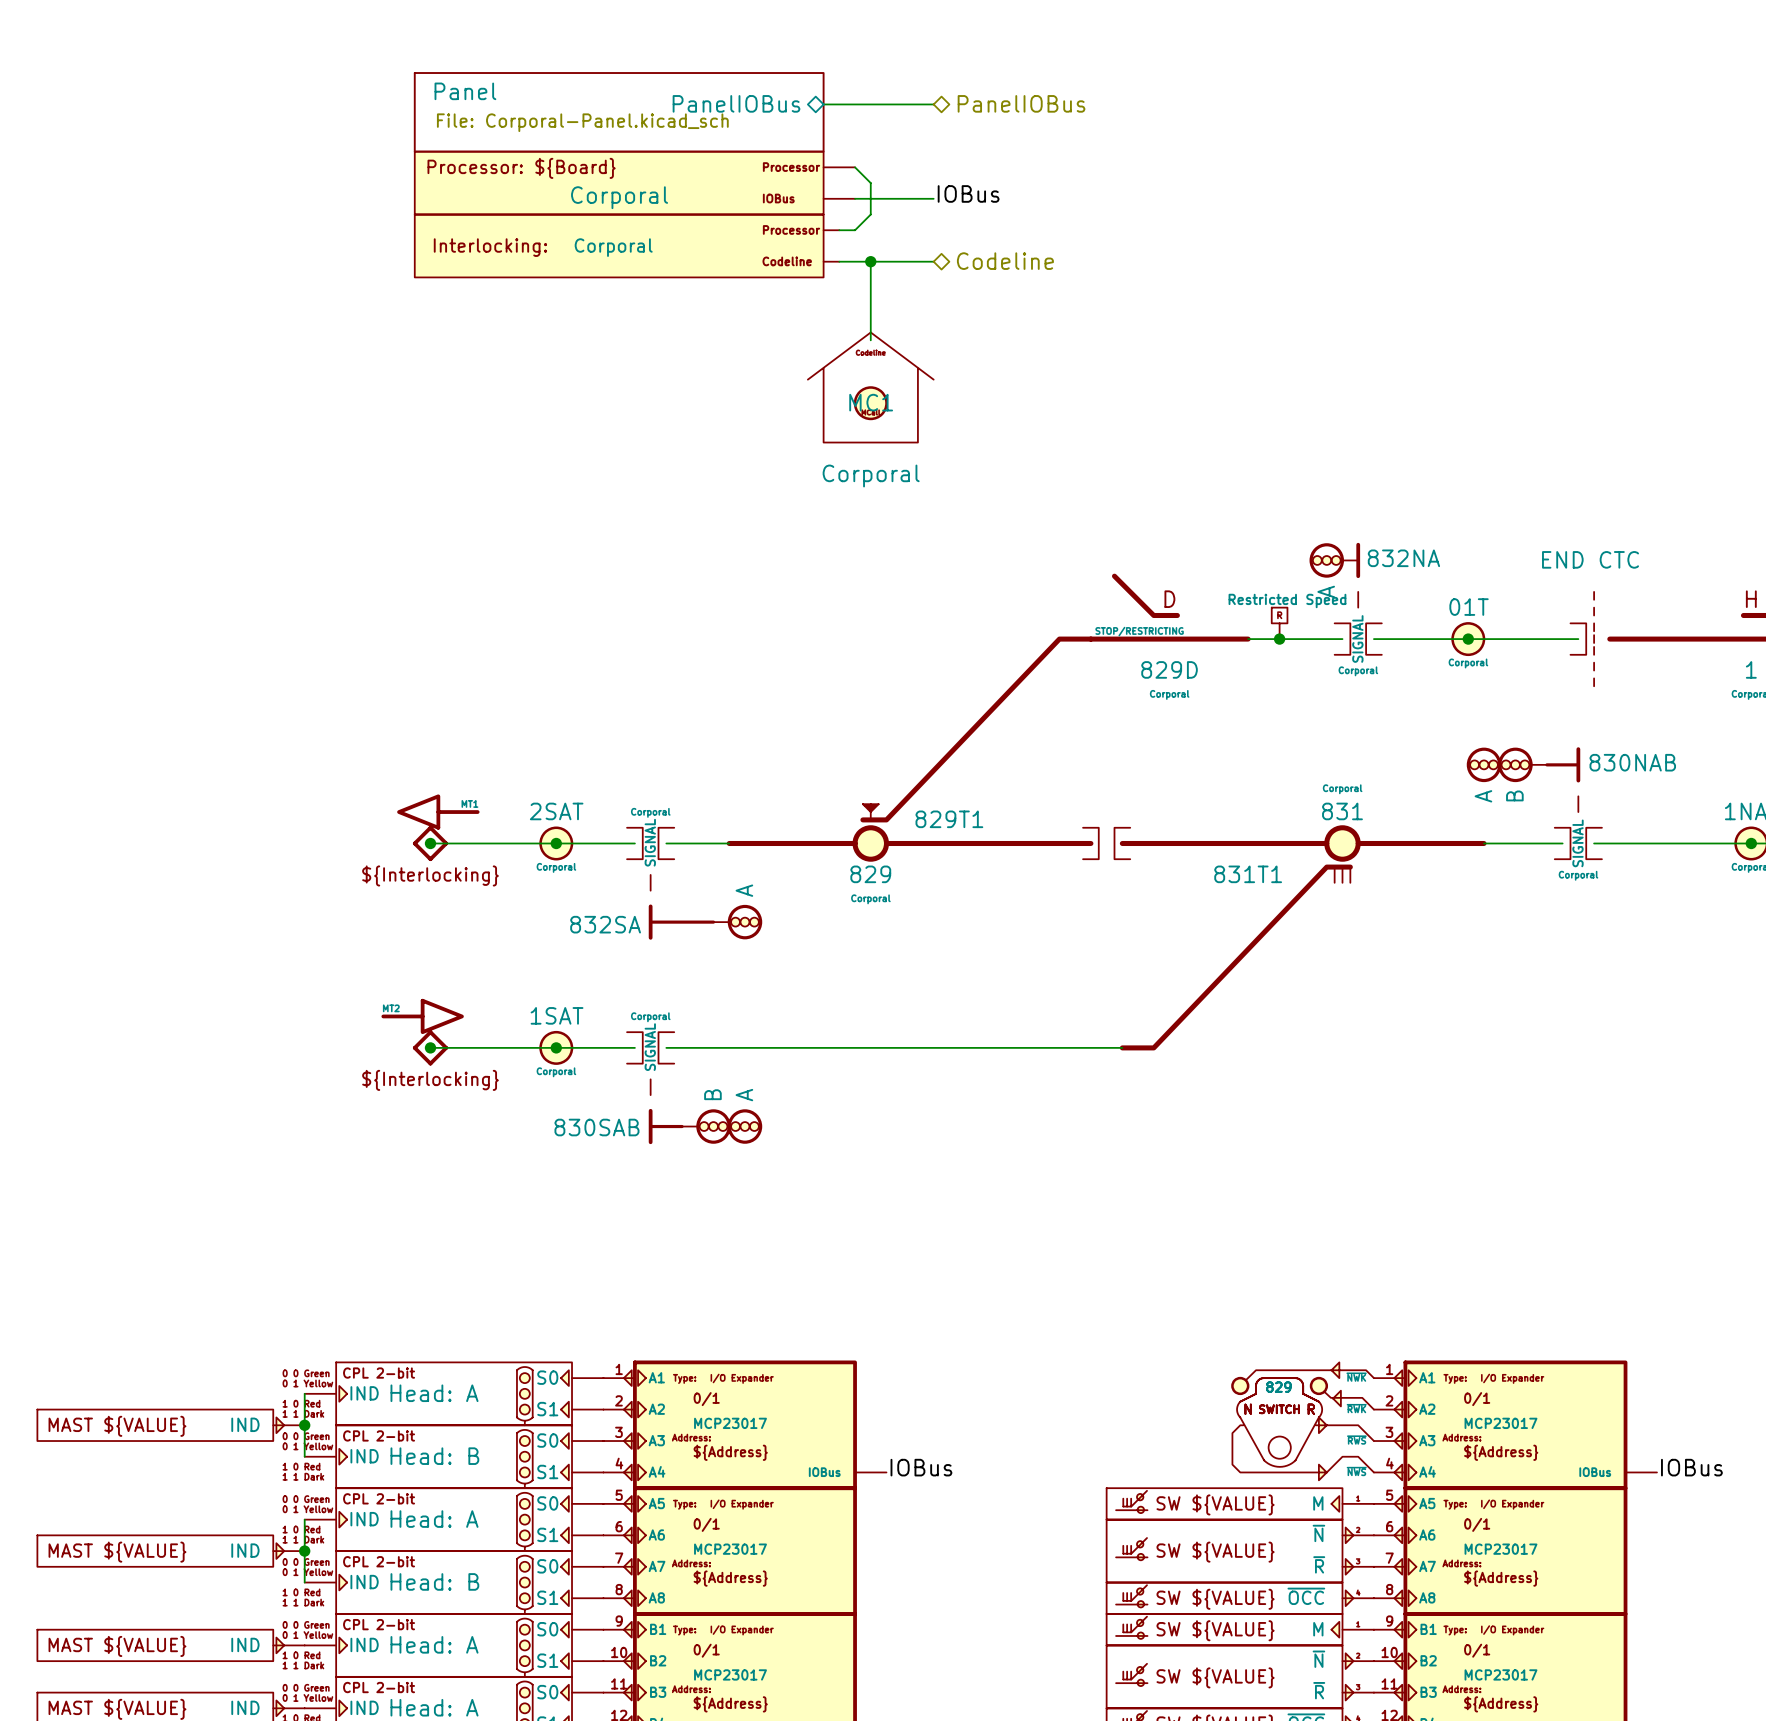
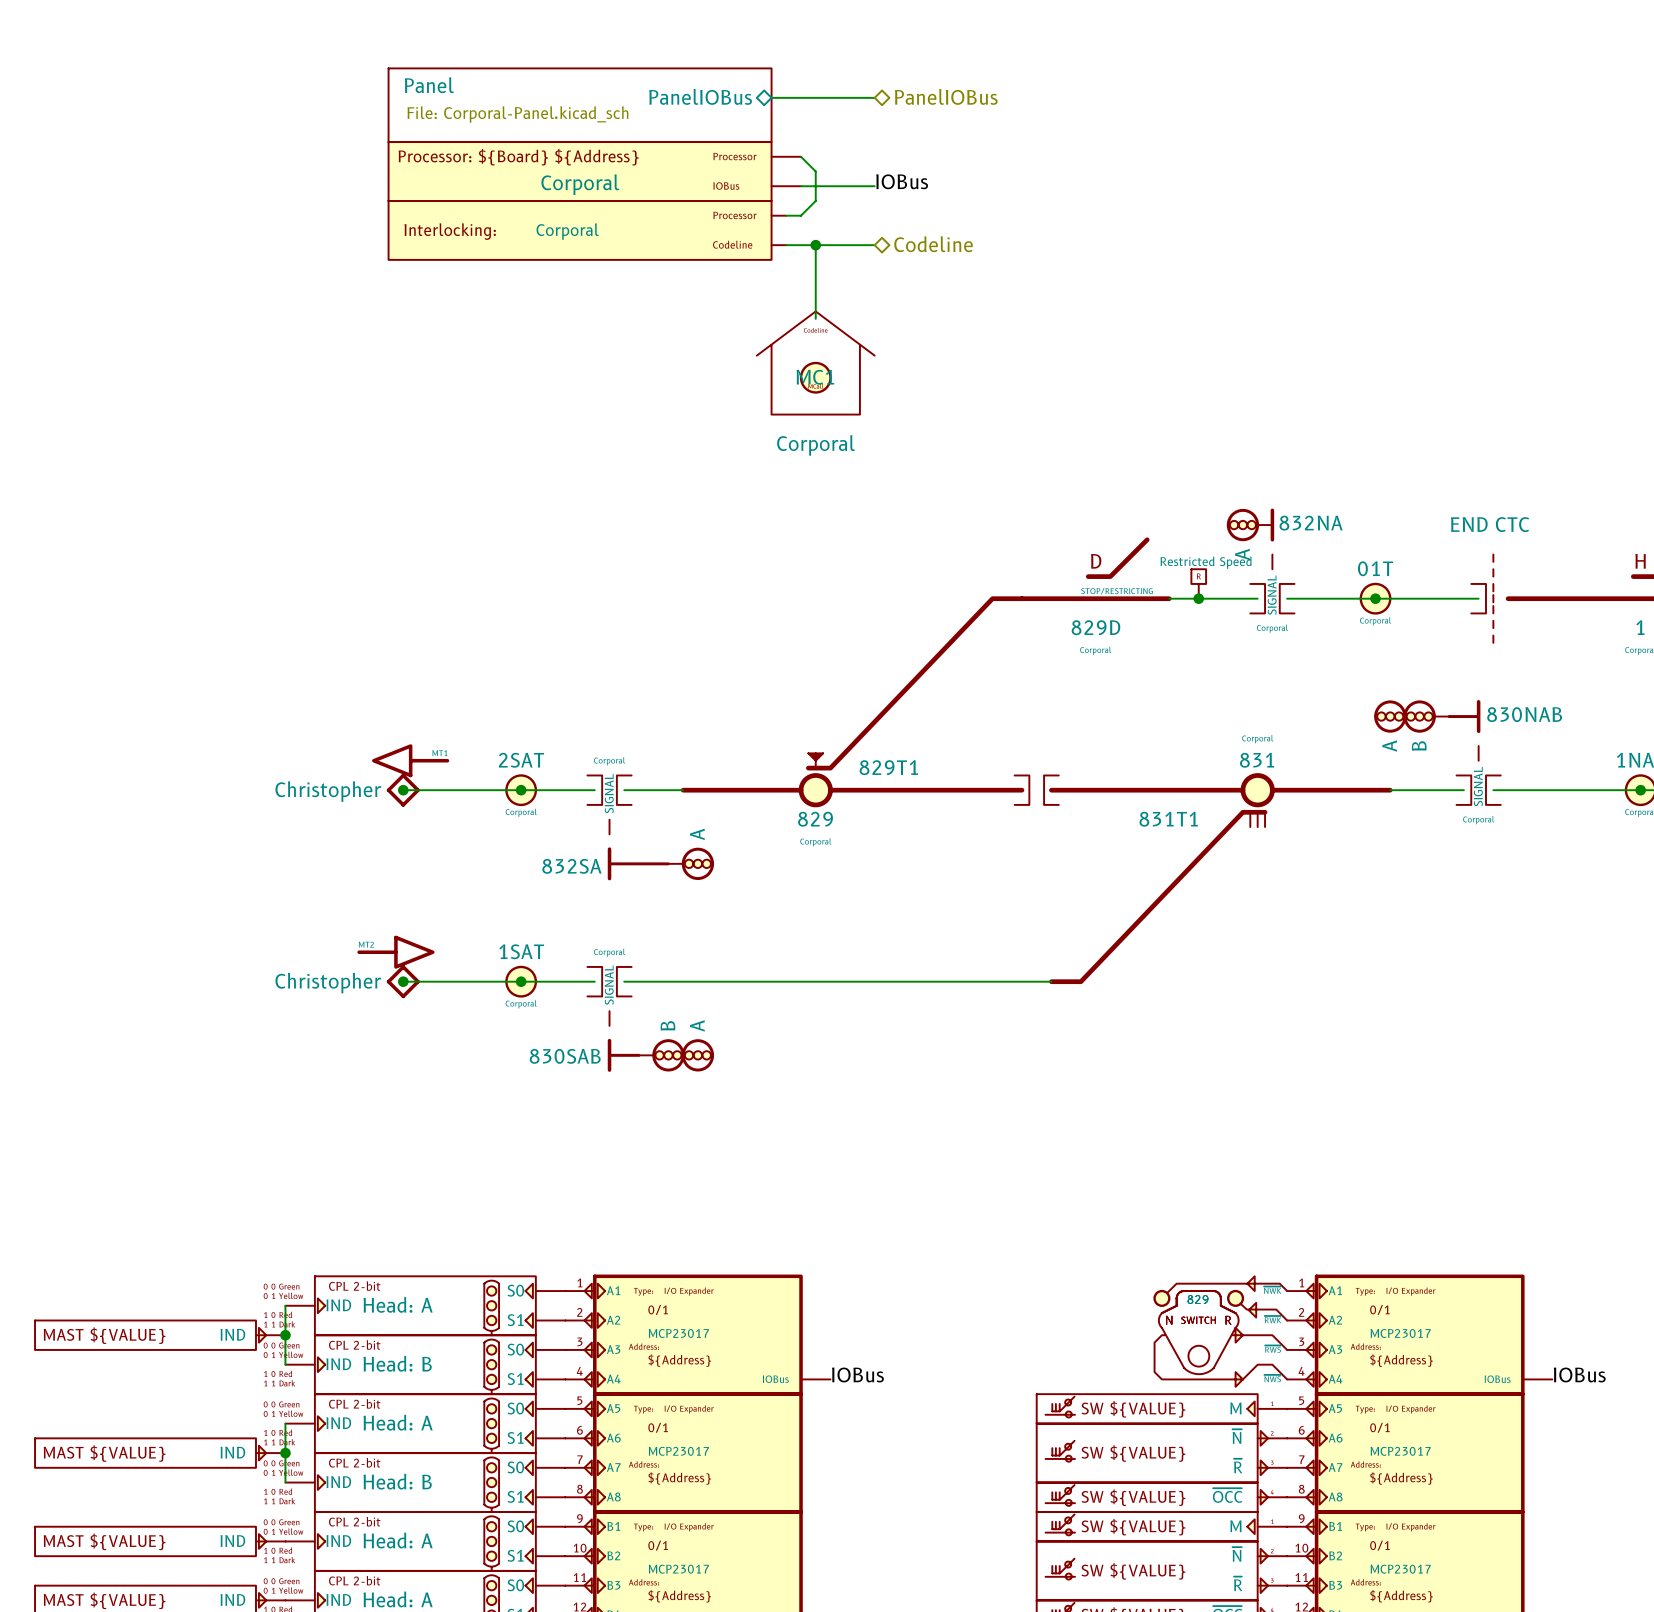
part text: Processor: ${Board} (521, 168) -> Processor: ${Board} ${Address} (518, 157)
part flip: as is (1169, 607) -> left-right (1095, 569)
part value: none -> Christopher (328, 791)
part text: ${Interlocking} (430, 875) -> none
part value: none -> Christopher (328, 983)
part text: ${Interlocking} (430, 1080) -> none

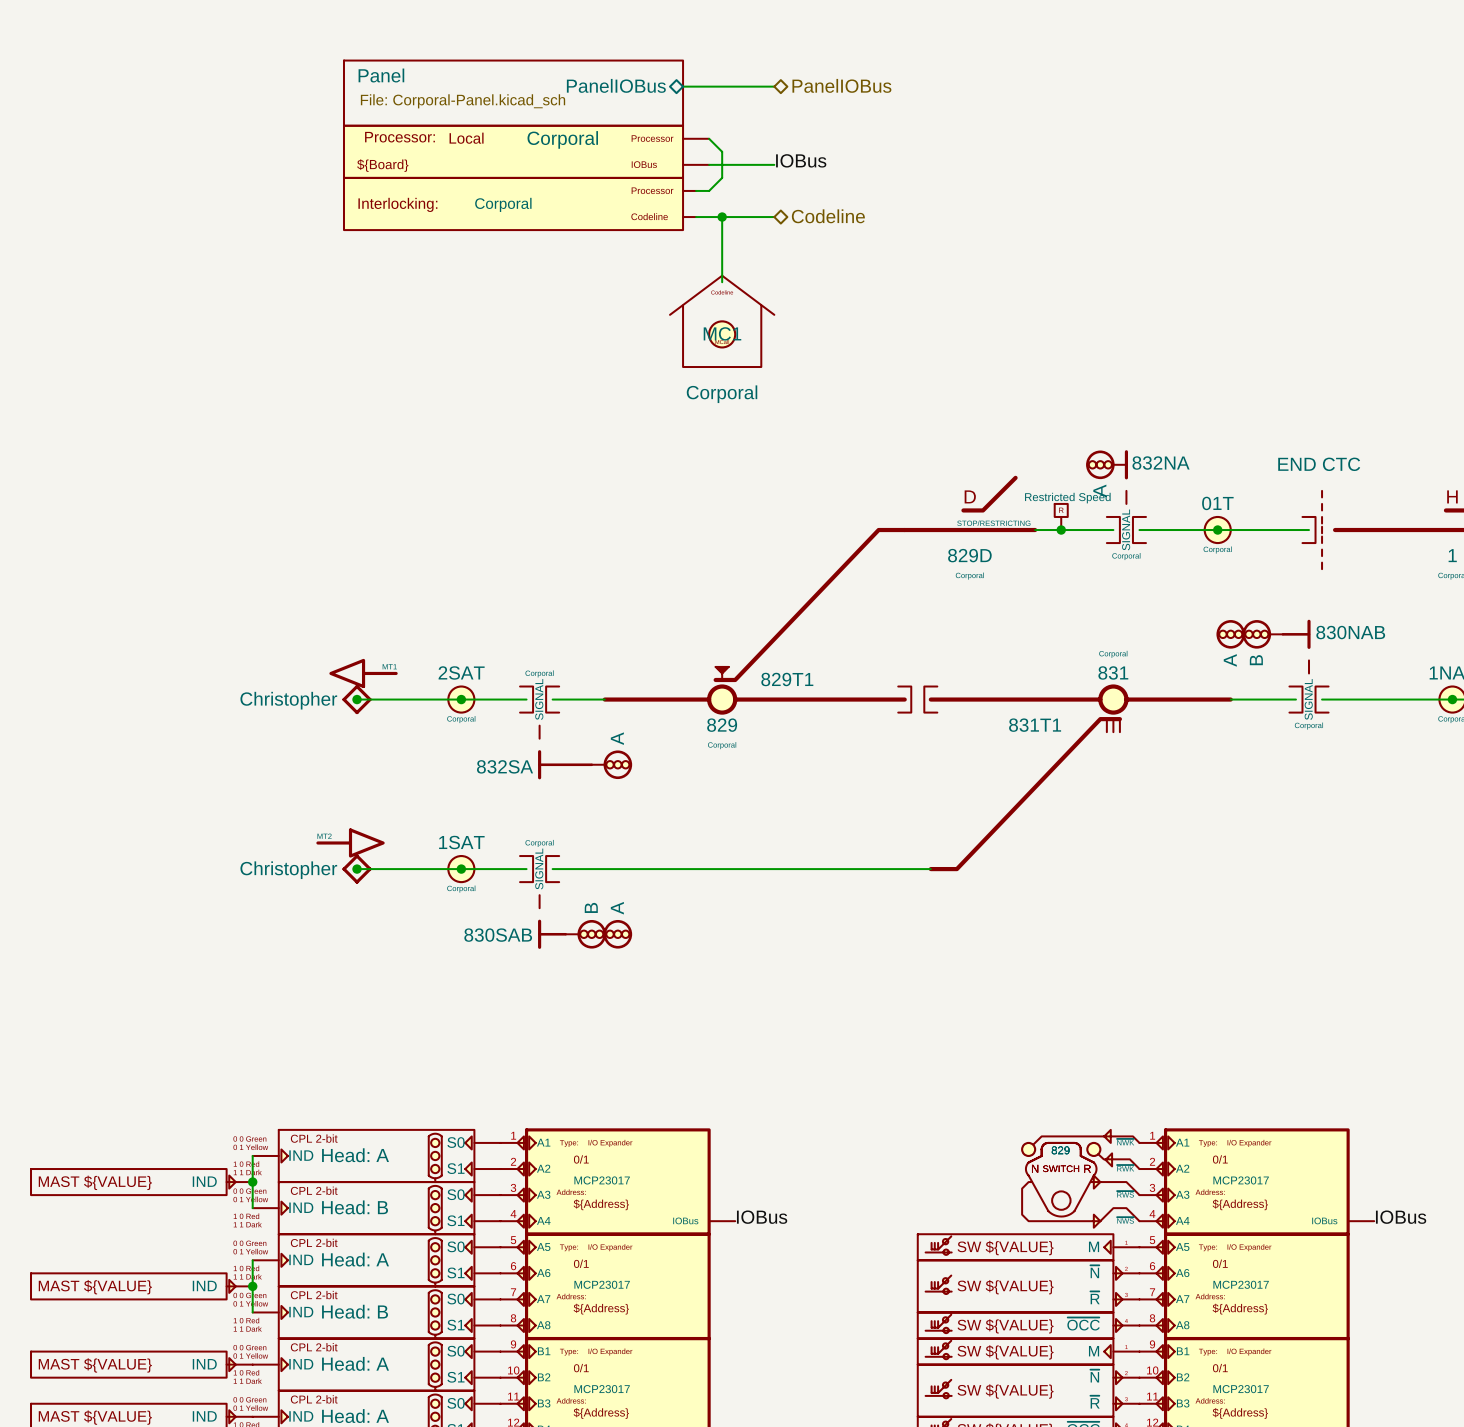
part text: none -> Processor: (399, 137)
part text: none -> Local (466, 138)
part text: Processor: ${Board} ${Address} (518, 157) -> none
part value position: Corporal (580, 184) -> Corporal (562, 139)
part text: none -> ${Board} (382, 165)

